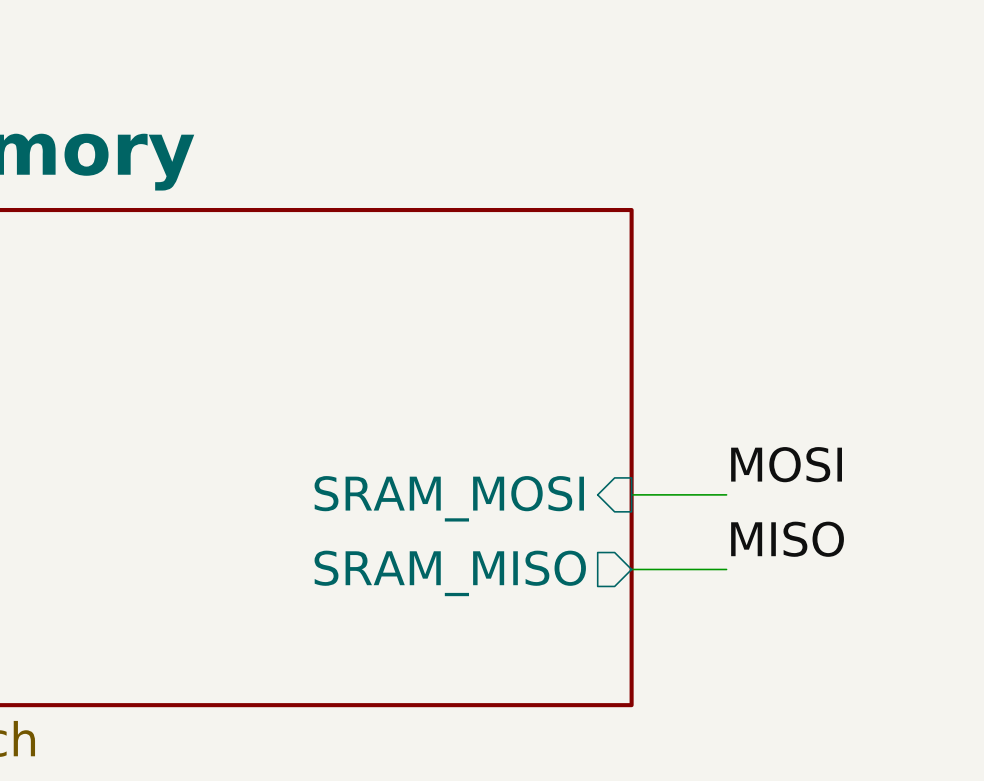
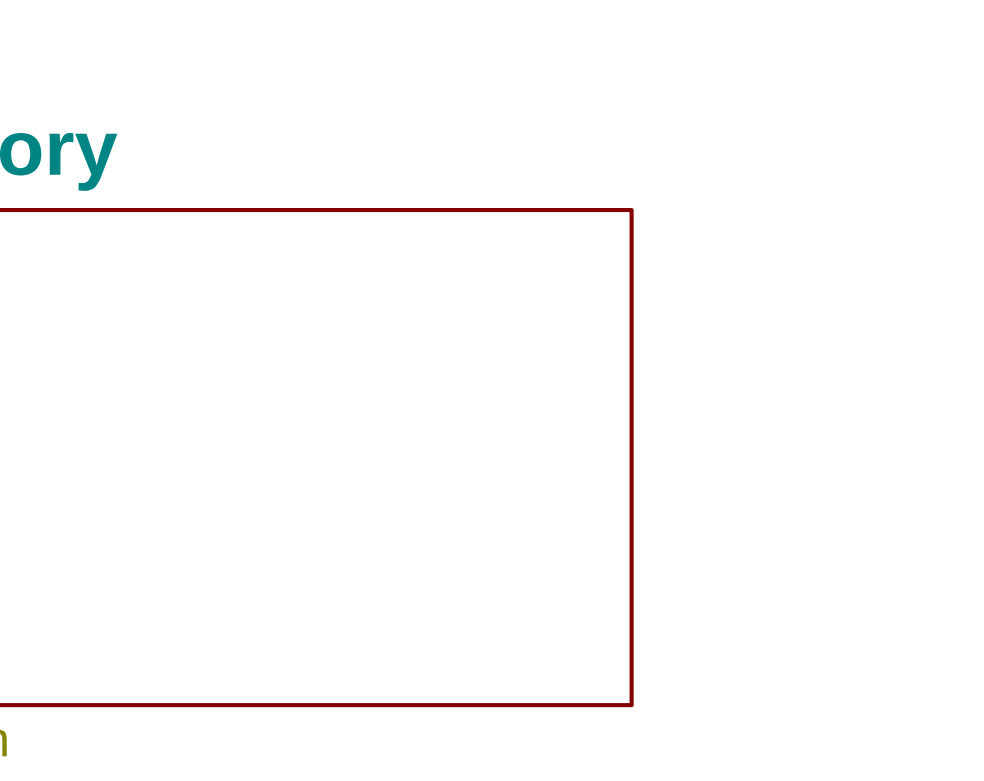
label: MOSI (786, 464) -> none
wire: (631, 494) (726, 494) -> none
sheet pin: SRAM_MOSI (449, 498) -> none
label: MISO (787, 539) -> none
wire: (631, 569) (726, 569) -> none
sheet pin: SRAM_MISO (450, 573) -> none

